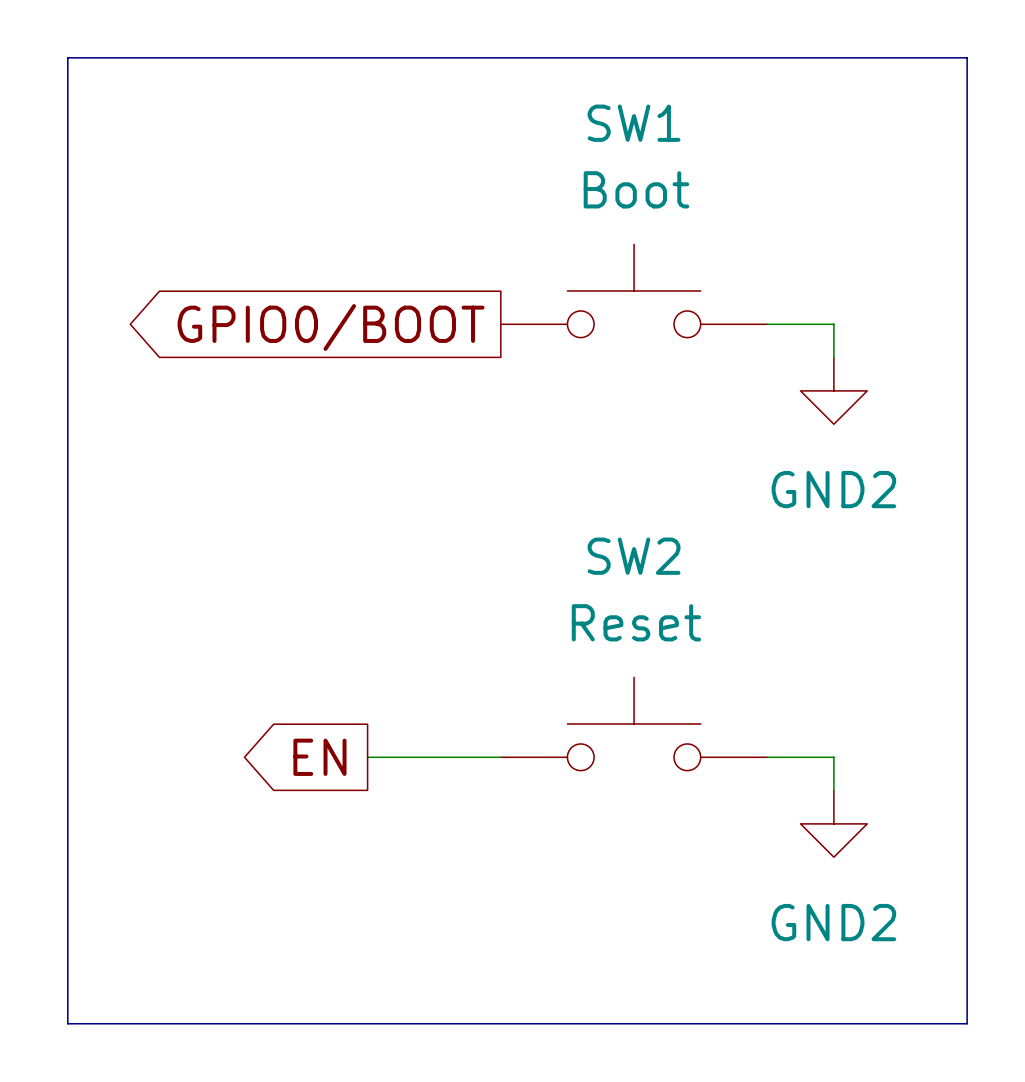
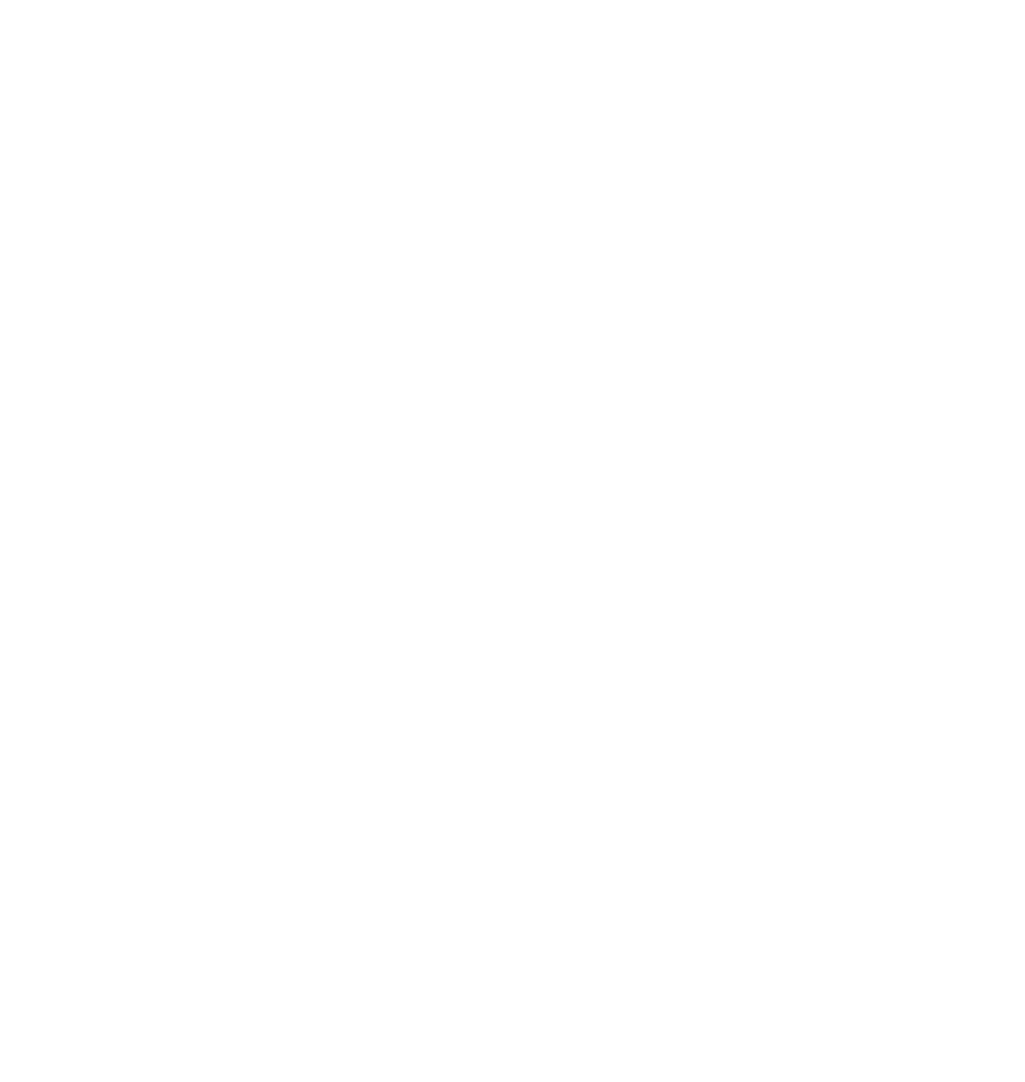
line: (67, 57) (967, 57) (967, 1023) (67, 1023) (67, 57) -> none
SW1: Boot (634, 290) -> none
wire: (767, 324) (833, 324) (833, 357) -> none
global label: GPIO0/BOOT (331, 327) -> none
power symbol: GND2 (833, 390) -> none
SW2: Reset (634, 723) -> none
global label: EN (319, 757) -> none
wire: (367, 757) (500, 757) -> none
wire: (767, 757) (833, 757) (833, 790) -> none
power symbol: GND2 (833, 823) -> none

